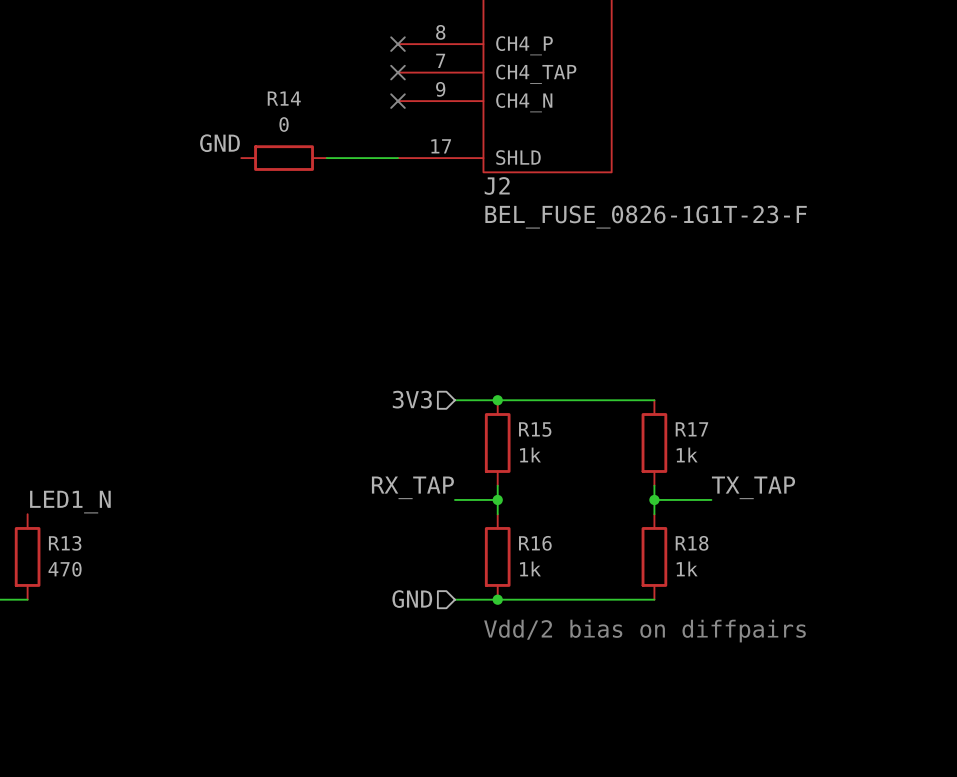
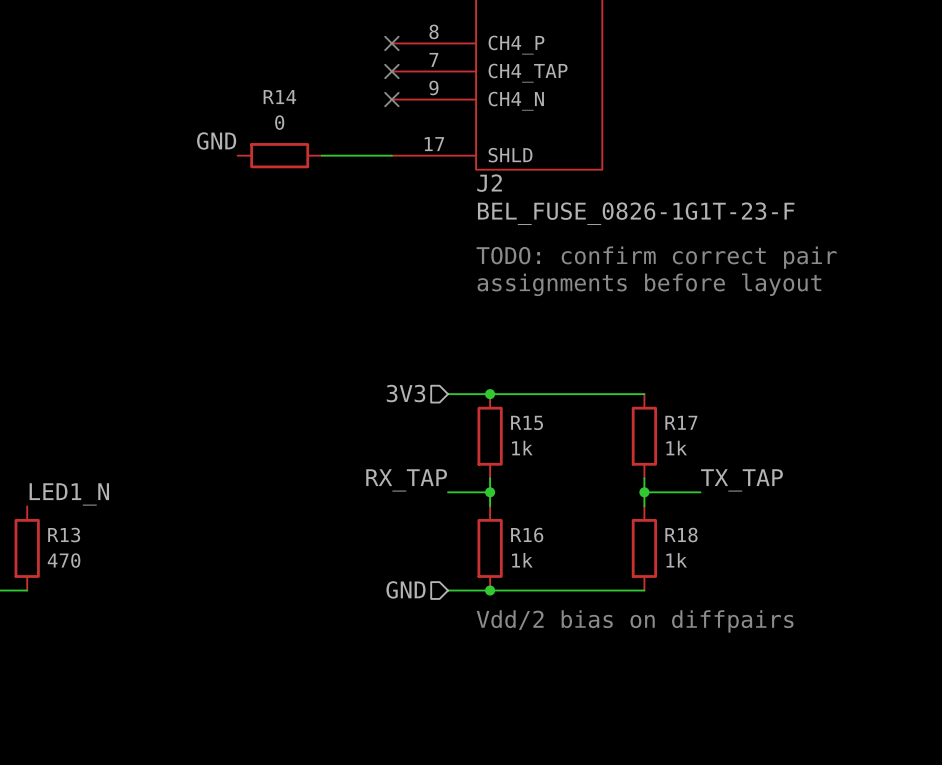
text: none -> TODO: confirm correct pair (656, 257)
text: none -> assignments before layout (649, 284)

